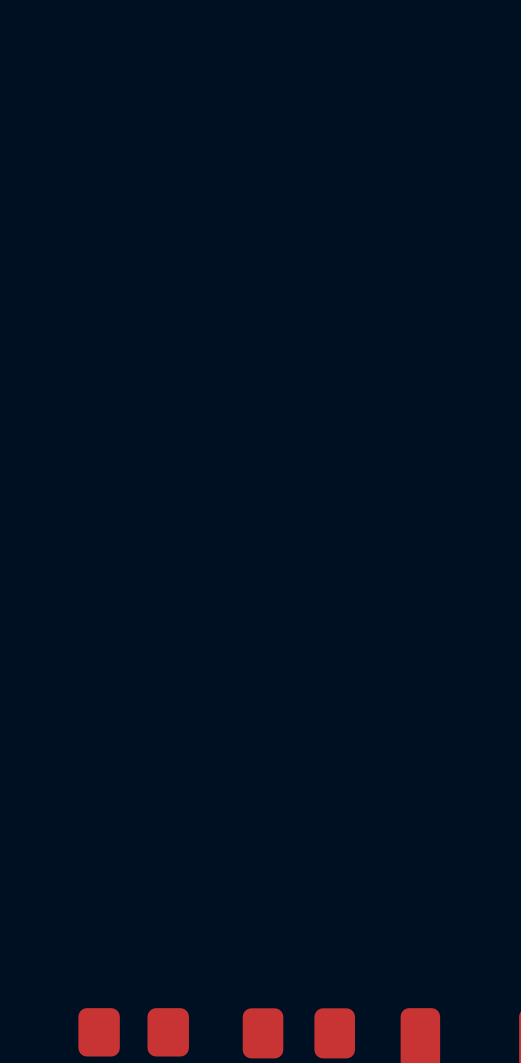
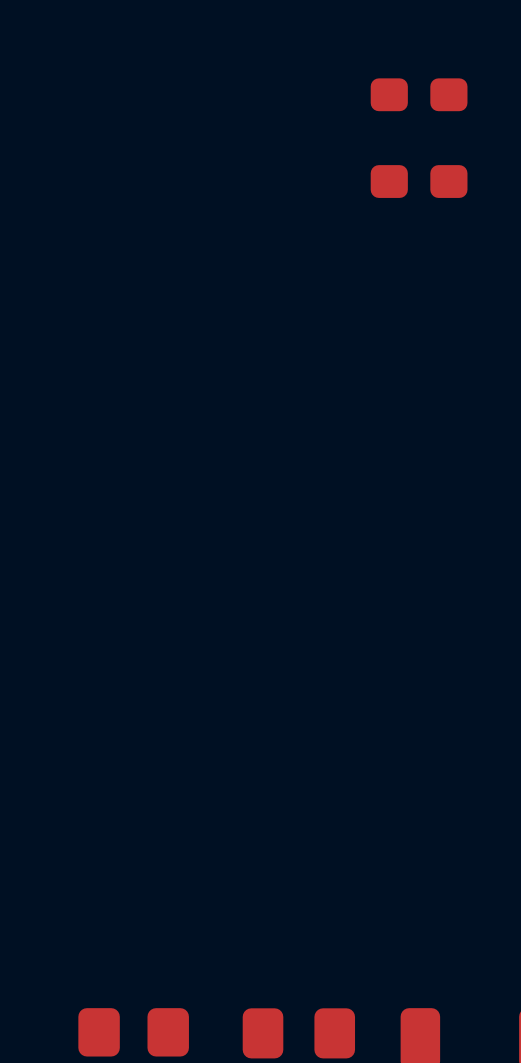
part: none -> (419, 94)
part: none -> (419, 181)

